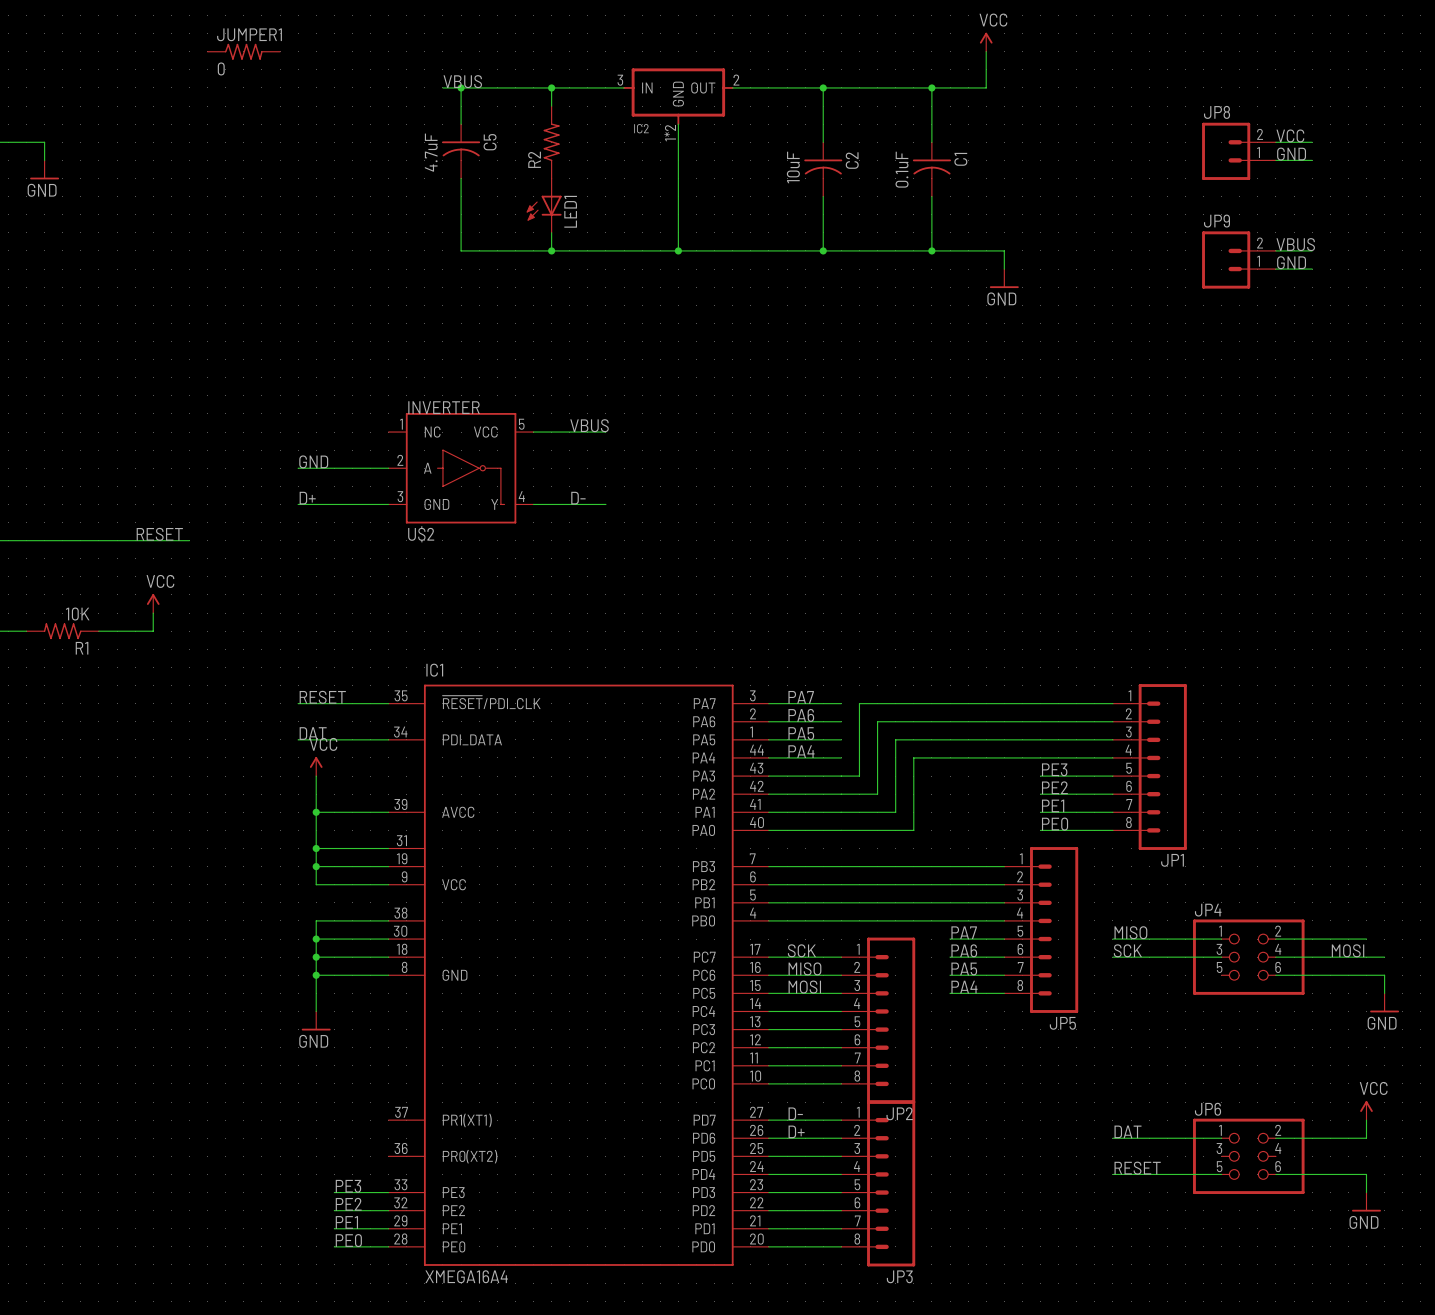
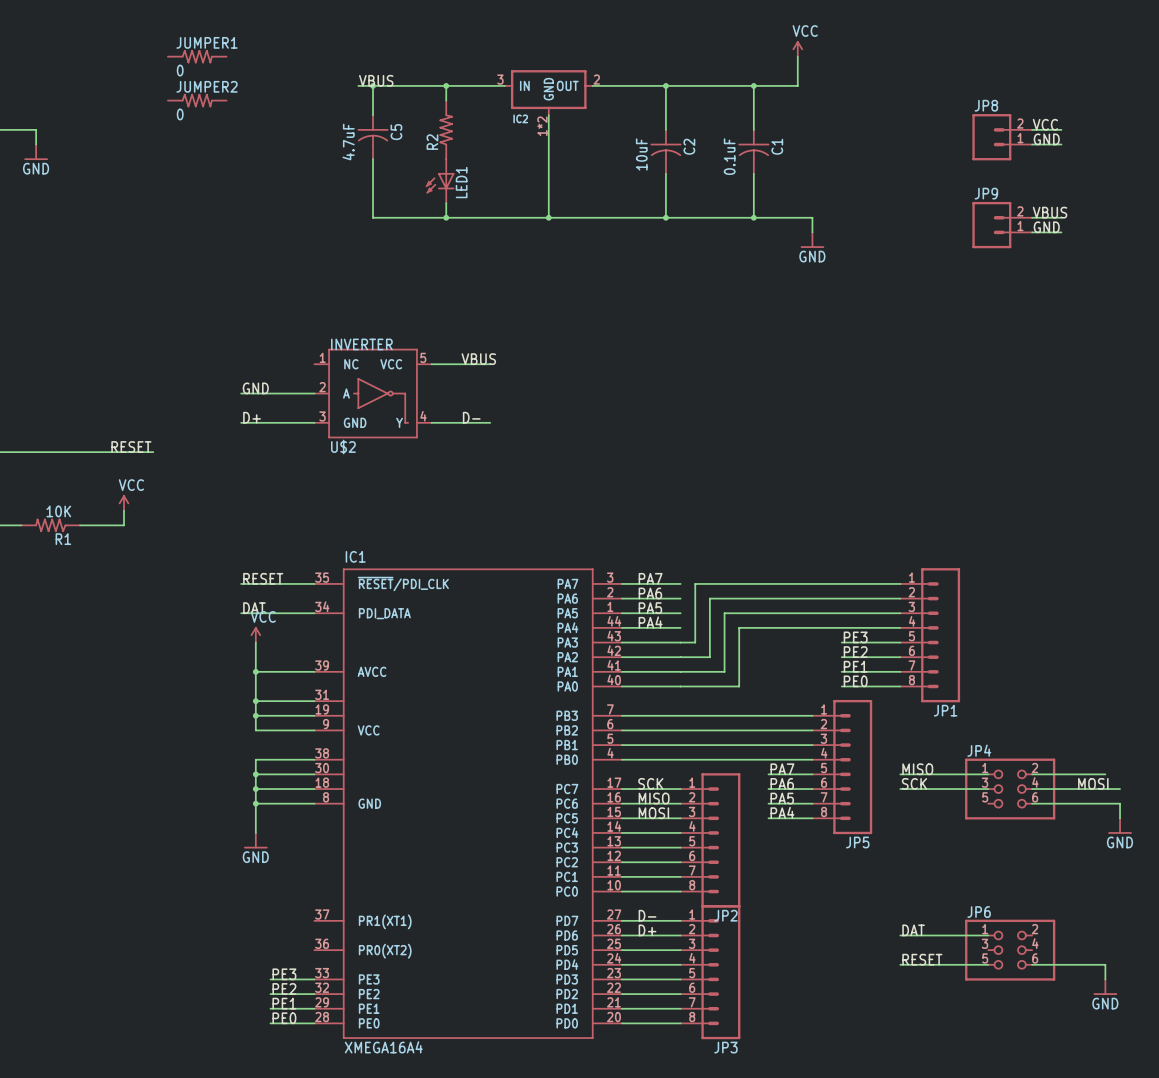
JUMPER2: none -> 0 (197, 100)
power symbol: VCC (1366, 1110) -> none
wire: (1366, 1120) (1366, 1138) (1275, 1138) -> none

